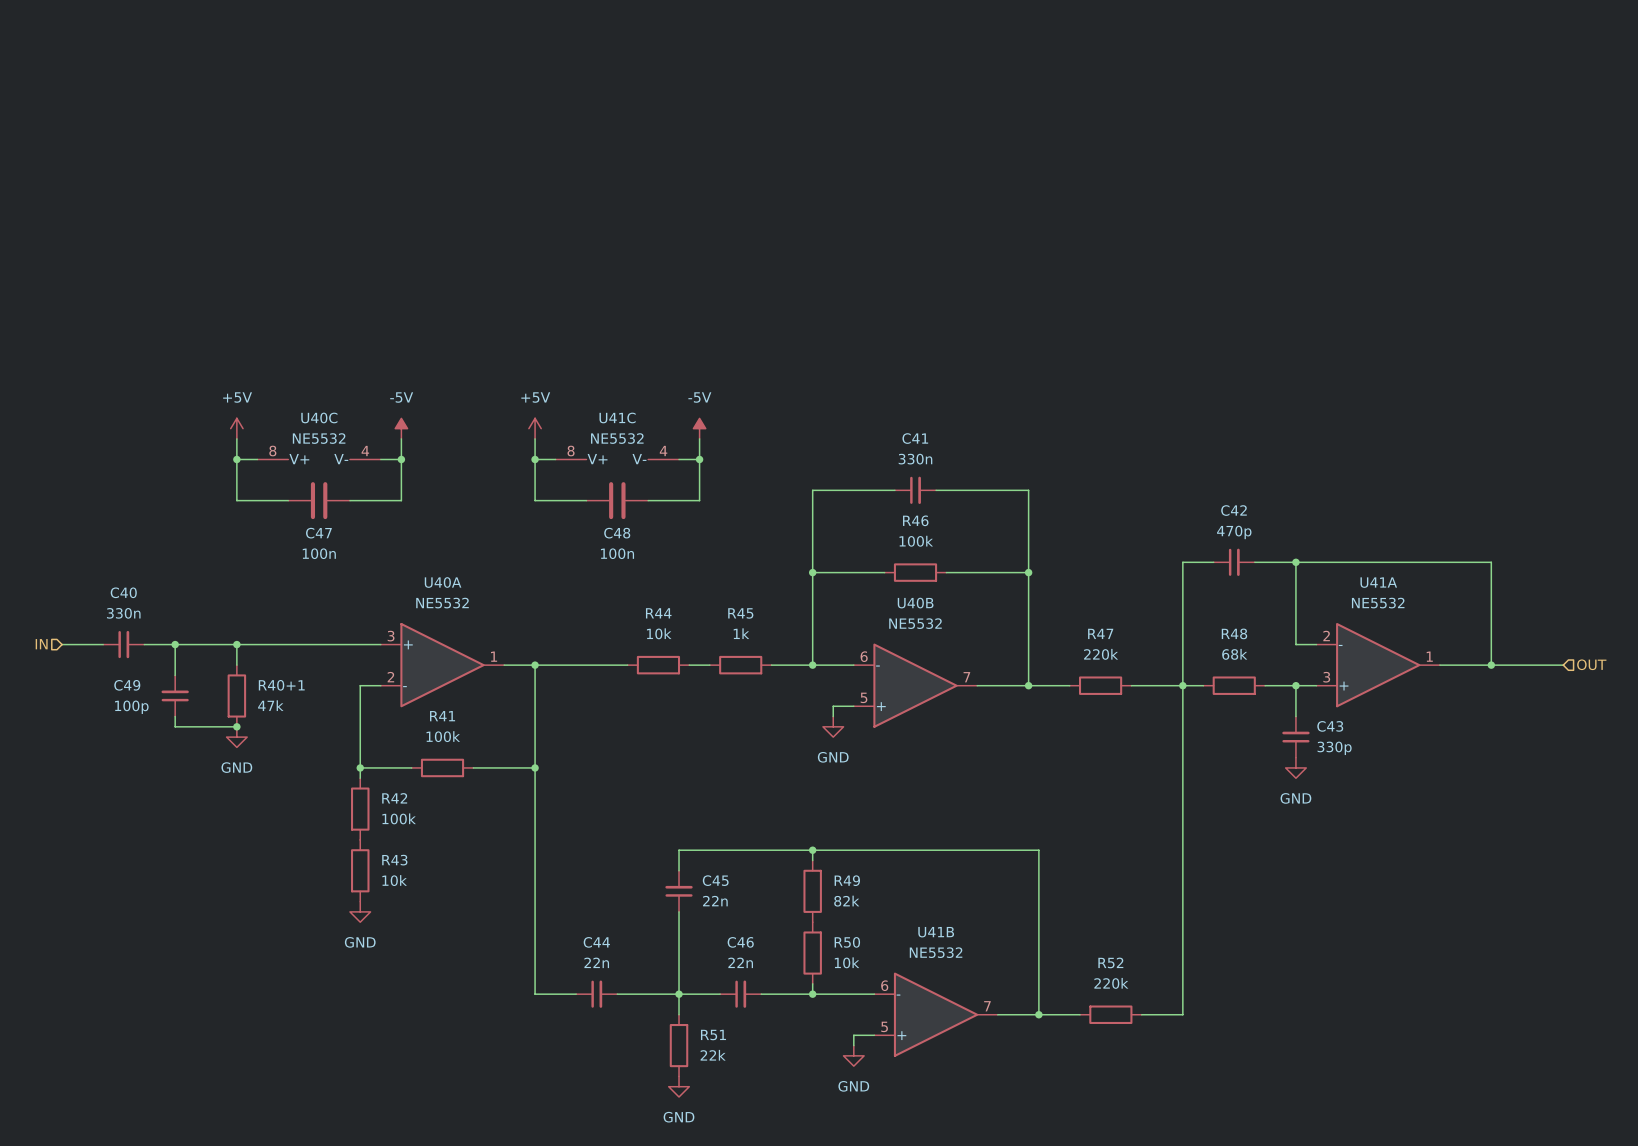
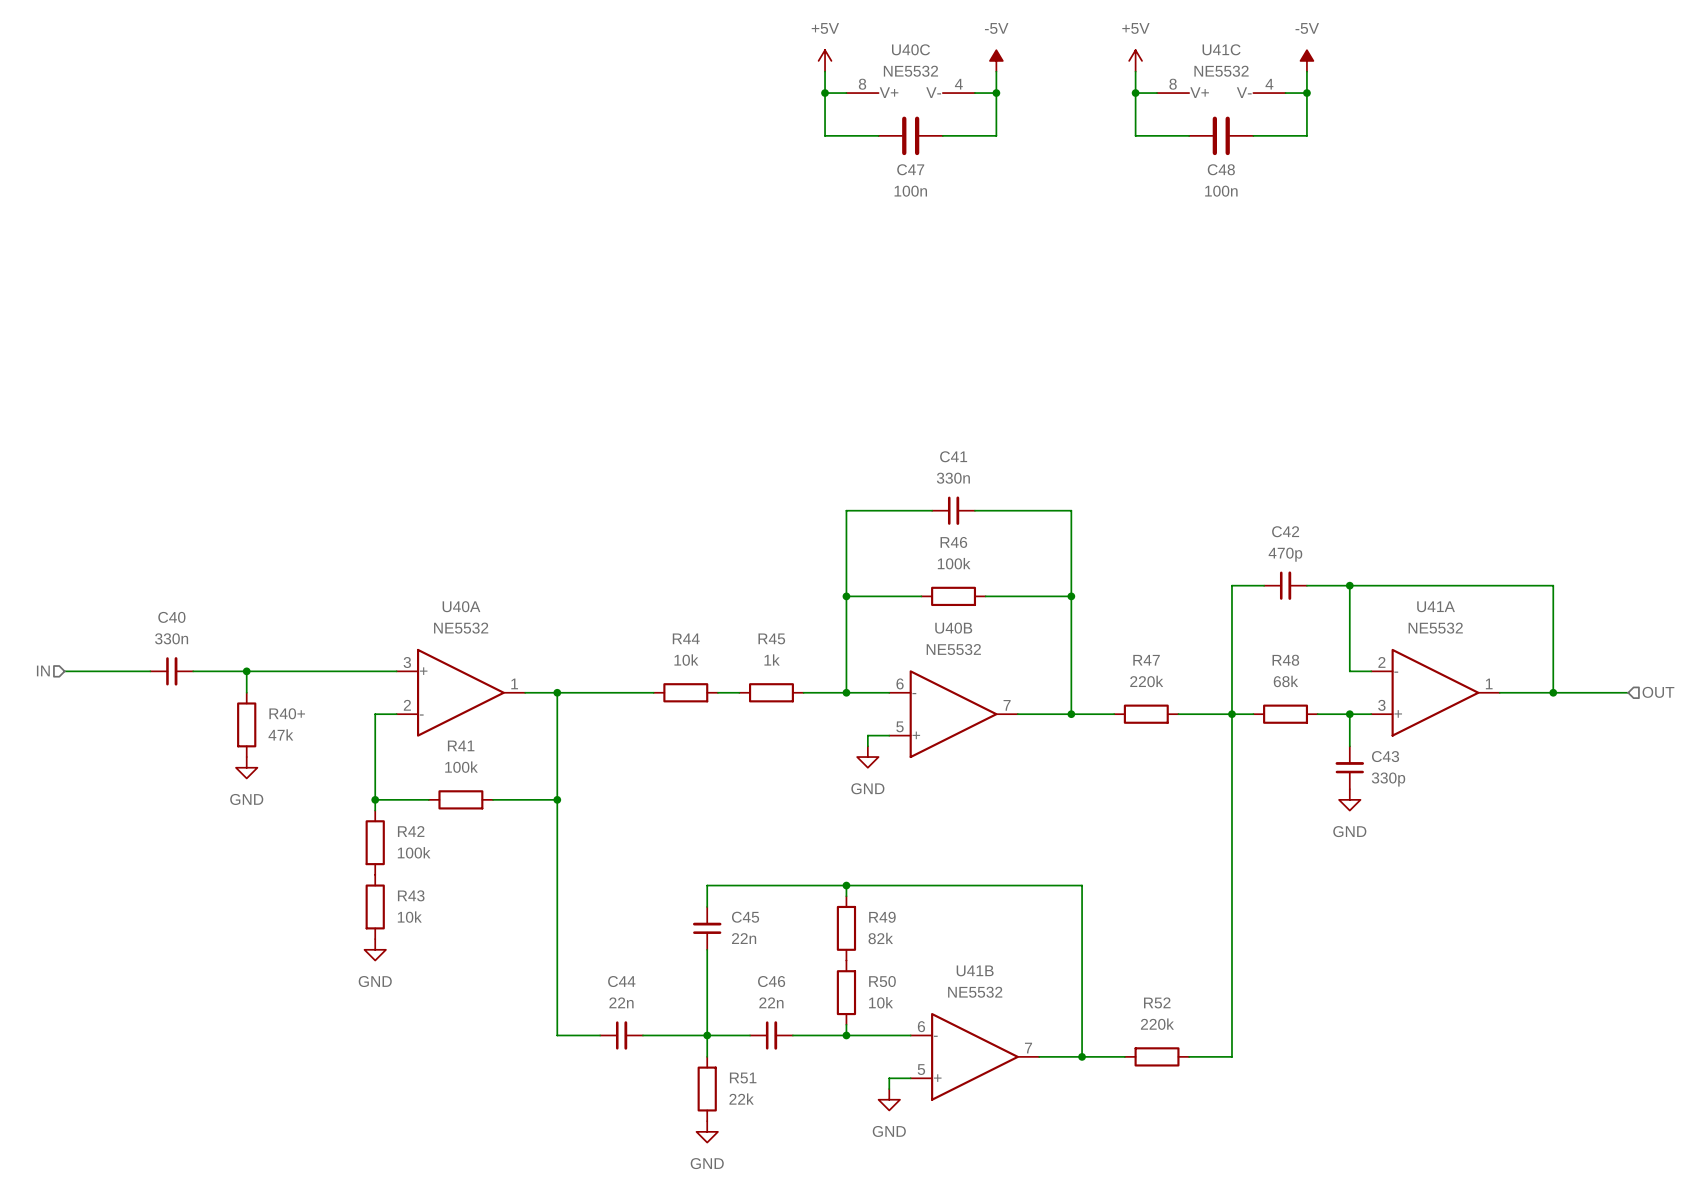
power symbol: none -> +5V (825, 60)
power symbol: none -> -5V (996, 60)
power symbol: none -> +5V (1135, 60)
power symbol: none -> -5V (1306, 60)
wire: none -> (825, 71) (825, 135) (878, 135)
wire: none -> (996, 71) (996, 135) (942, 135)
wire: none -> (1135, 71) (1135, 135) (1189, 135)
wire: none -> (1306, 71) (1306, 135) (1253, 135)
wire: none -> (825, 93) (846, 93)
junction: none -> (825, 93)
wire: none -> (974, 93) (996, 93)
junction: none -> (996, 93)
wire: none -> (1135, 93) (1157, 93)
junction: none -> (1135, 93)
wire: none -> (1285, 93) (1306, 93)
junction: none -> (1306, 93)
power symbol: +5V (236, 428) -> none
power symbol: -5V (401, 428) -> none
power symbol: +5V (535, 428) -> none
power symbol: -5V (699, 428) -> none
wire: (236, 438) (236, 500) (288, 500) -> none
wire: (401, 438) (401, 500) (349, 500) -> none
wire: (535, 438) (535, 500) (586, 500) -> none
wire: (699, 438) (699, 500) (648, 500) -> none
wire: (236, 459) (257, 459) -> none
junction: (236, 459) -> none
U40C position: (319, 459) -> (910, 93)
wire: (380, 459) (401, 459) -> none
junction: (401, 459) -> none
wire: (535, 459) (555, 459) -> none
junction: (535, 459) -> none
U41C position: (617, 459) -> (1221, 93)
wire: (679, 459) (699, 459) -> none
junction: (699, 459) -> none
C47 position: (319, 500) -> (910, 135)
C48 position: (617, 500) -> (1221, 135)
C40 position: (123, 644) -> (171, 671)
wire: (175, 644) (175, 675) -> none
junction: (175, 644) -> none
R40+1 name: R40+1 (281, 685) -> R40+ (287, 713)
C49: 100p (175, 695) -> none
wire: (175, 716) (175, 726) (236, 726) -> none
junction: (236, 726) -> none

